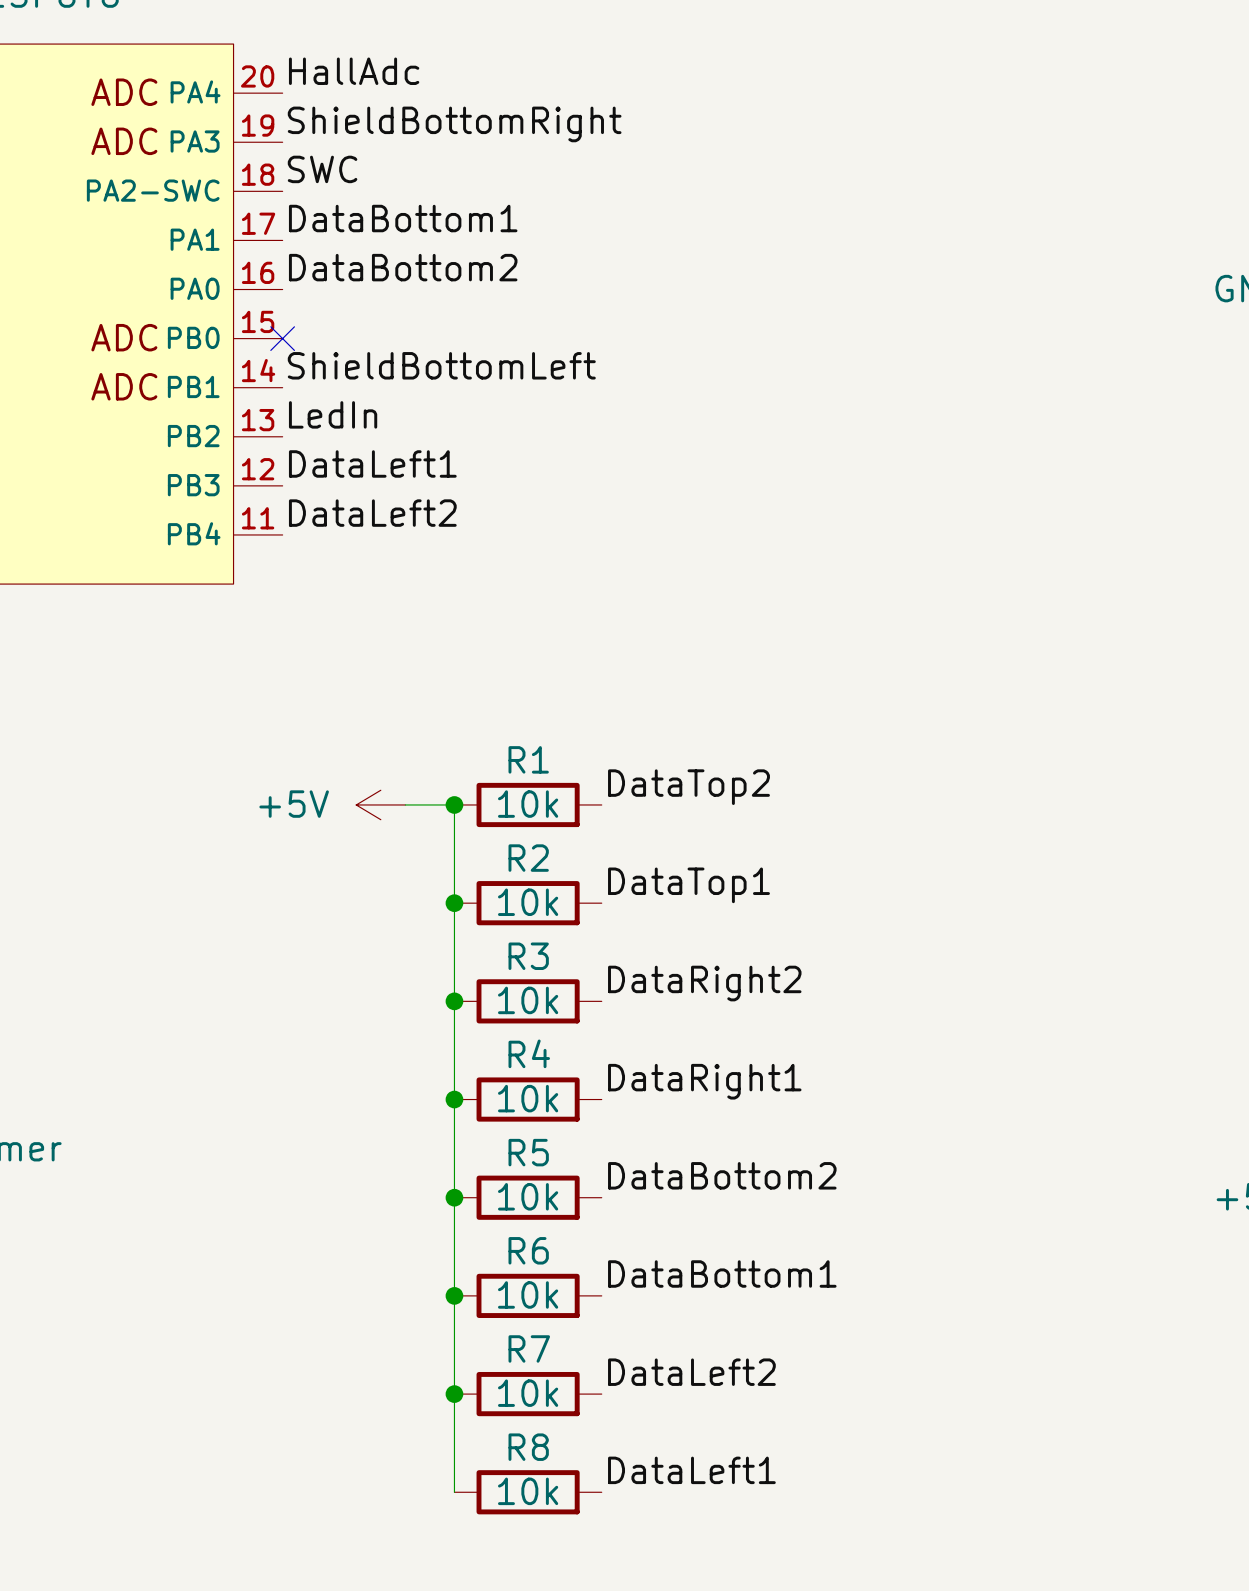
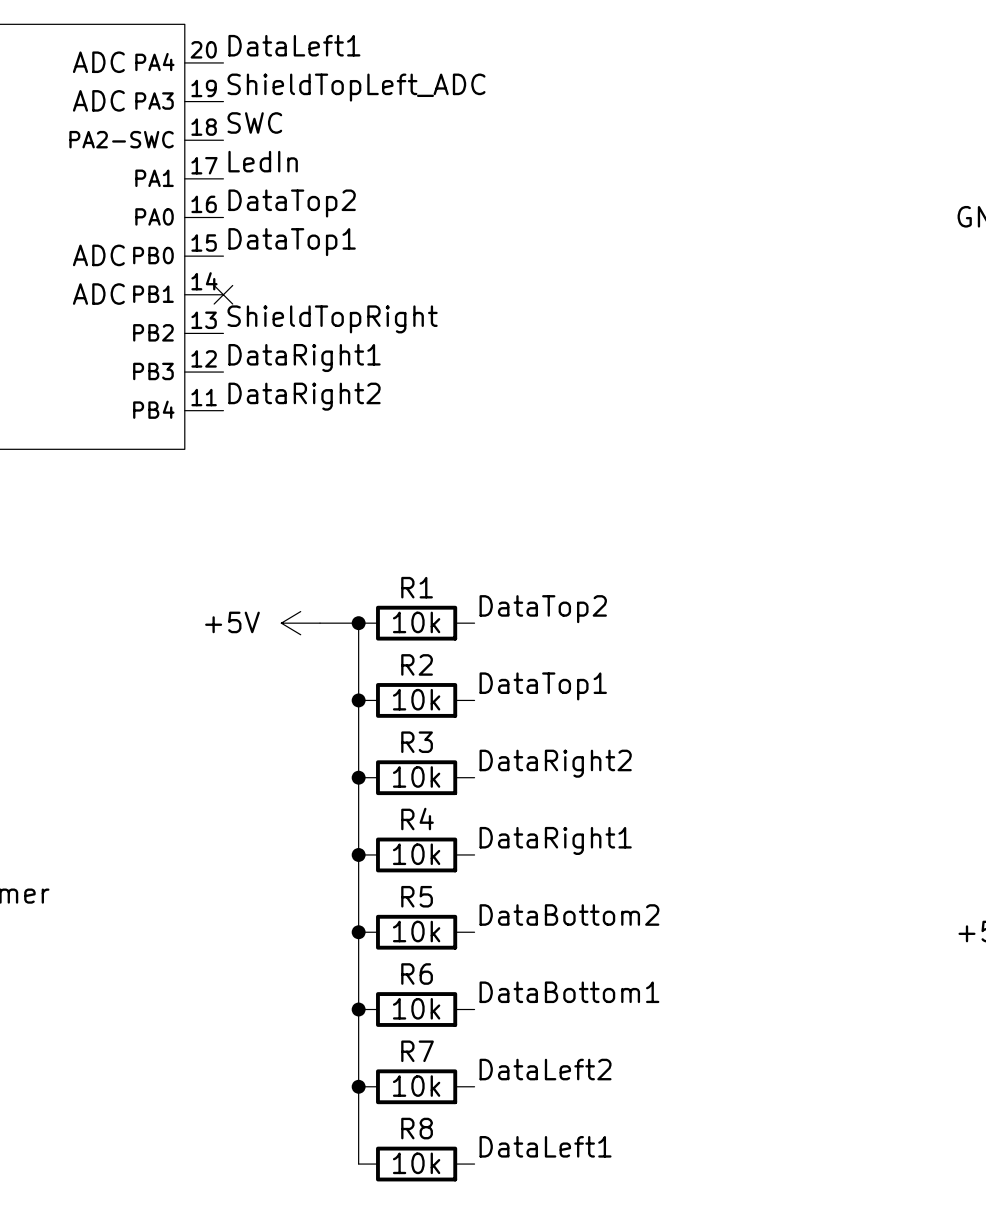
label: HallAdc (354, 71) -> DataLeft1 (294, 45)
label: ShieldBottomRight (454, 124) -> ShieldTopLeft_ADC (356, 87)
label: DataBottom1 (403, 218) -> LedIn (263, 161)
label: DataBottom2 (403, 267) -> DataTop2 (292, 203)
label: none -> DataTop1 (292, 242)
no-connect mark position: (282, 338) -> (223, 294)
label: ShieldBottomLeft (441, 365) -> none
label: LedIn (333, 414) -> ShieldTopRight (332, 319)
label: DataLeft1 (372, 463) -> DataRight1 (304, 358)
label: DataLeft2 (372, 513) -> DataRight2 (304, 396)

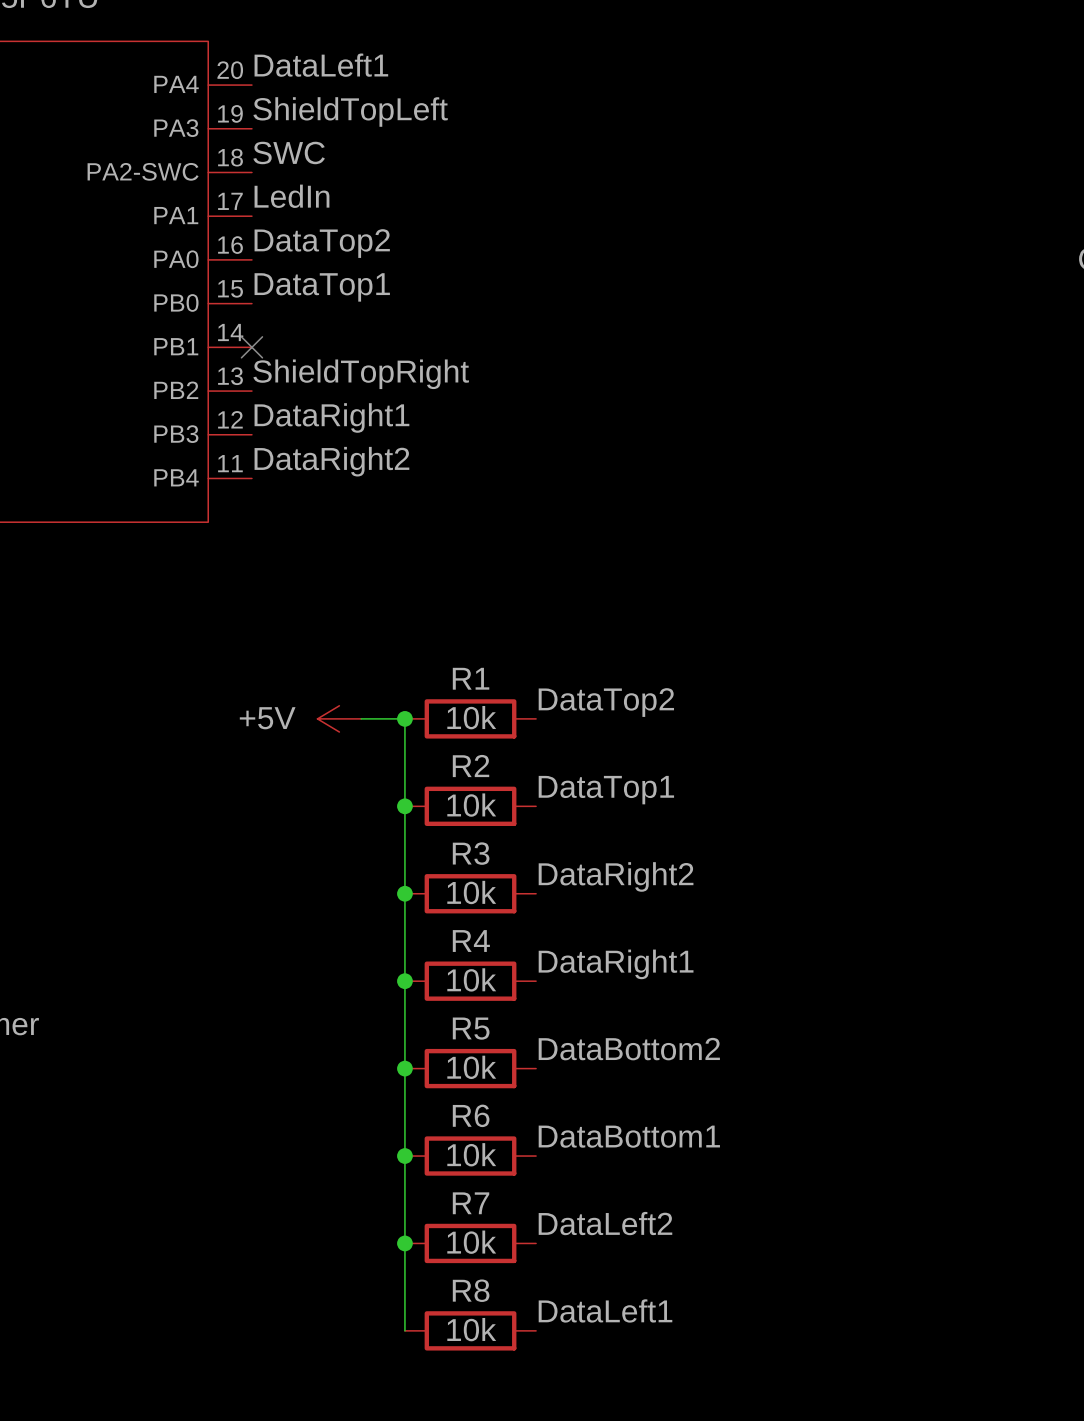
part text: ADC (98, 62) -> none
label: ShieldTopLeft_ADC (356, 87) -> ShieldTopLeft (350, 111)
part text: ADC (98, 100) -> none
part text: ADC (98, 255) -> none
part text: ADC (98, 294) -> none

